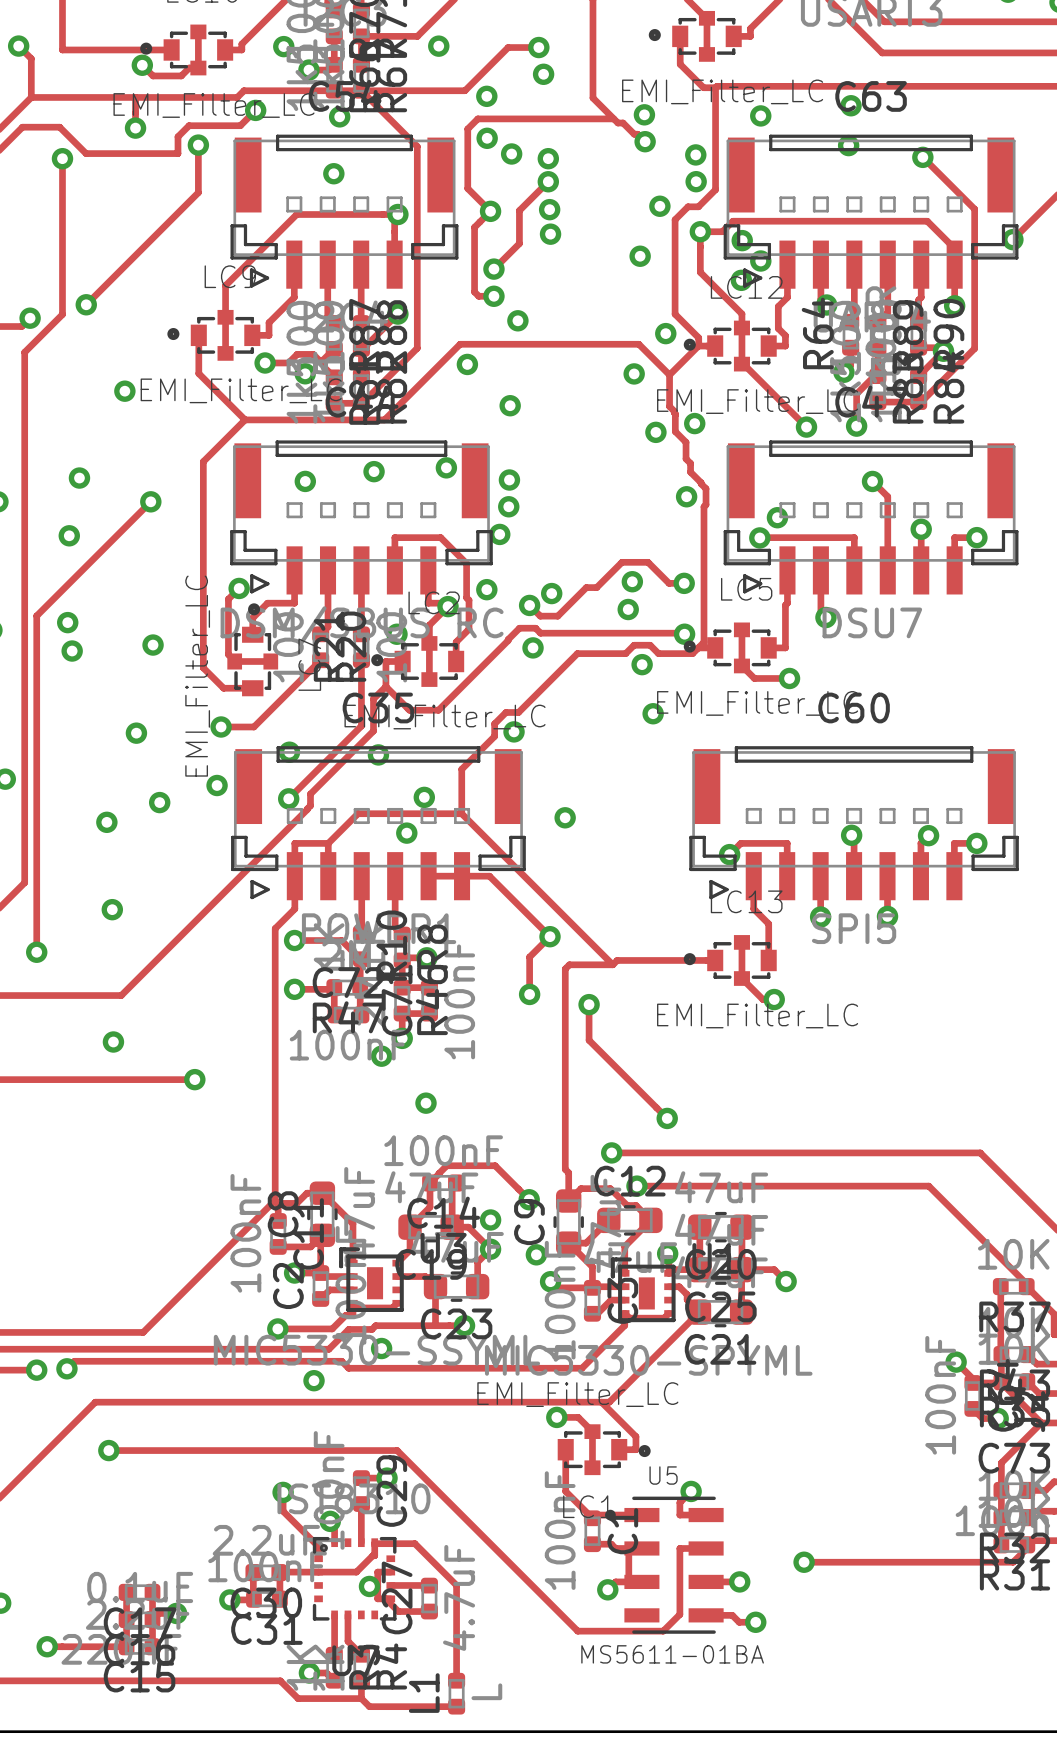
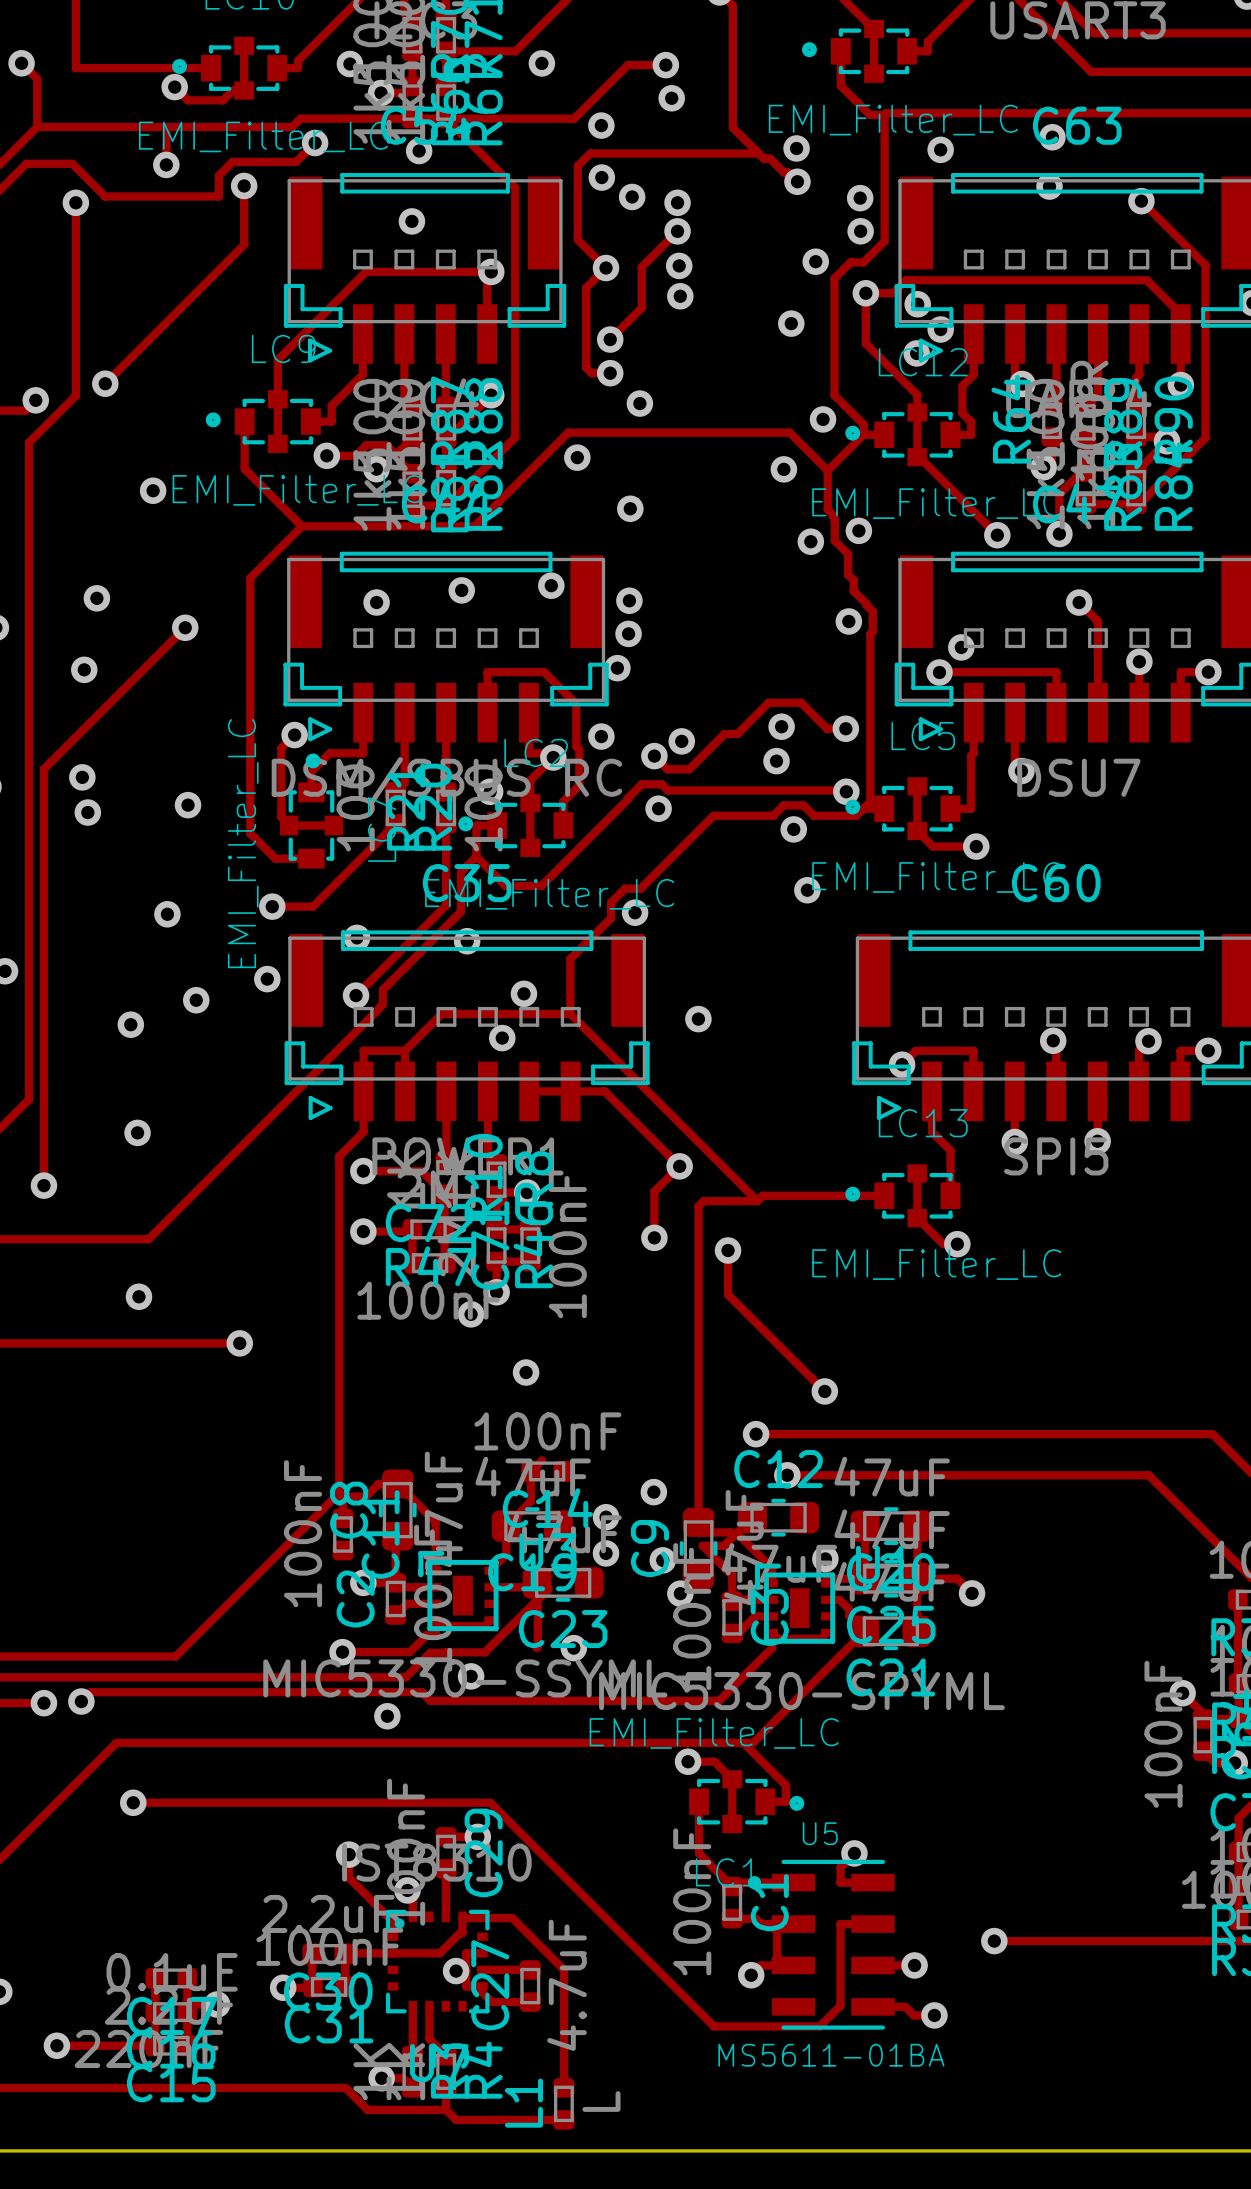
track: (565, 1169) (568, 1172) (568, 1201) (581, 1188) (610, 1188) (627, 1205) (636, 1205) (650, 1220) (624, 1246) (624, 1261) -> (698, 1454) (698, 1532) (737, 1533) (772, 1568)
track: (438, 1173) (446, 1165) (495, 1165) (529, 1199) -> none
track: (455, 1182) (452, 1186) (452, 1227) (468, 1227) (490, 1249) (477, 1262) (477, 1286) -> none
C9 position: (568, 1222) -> (698, 1548)
track: (322, 1235) (310, 1246) (278, 1246) -> none
track: (550, 1281) (556, 1287) (592, 1287) -> none
C23 position: (456, 1286) -> (563, 1582)
track: (464, 1325) (375, 1325) (371, 1329) (361, 1329) -> (548, 1588) (484, 1652) (446, 1652)

